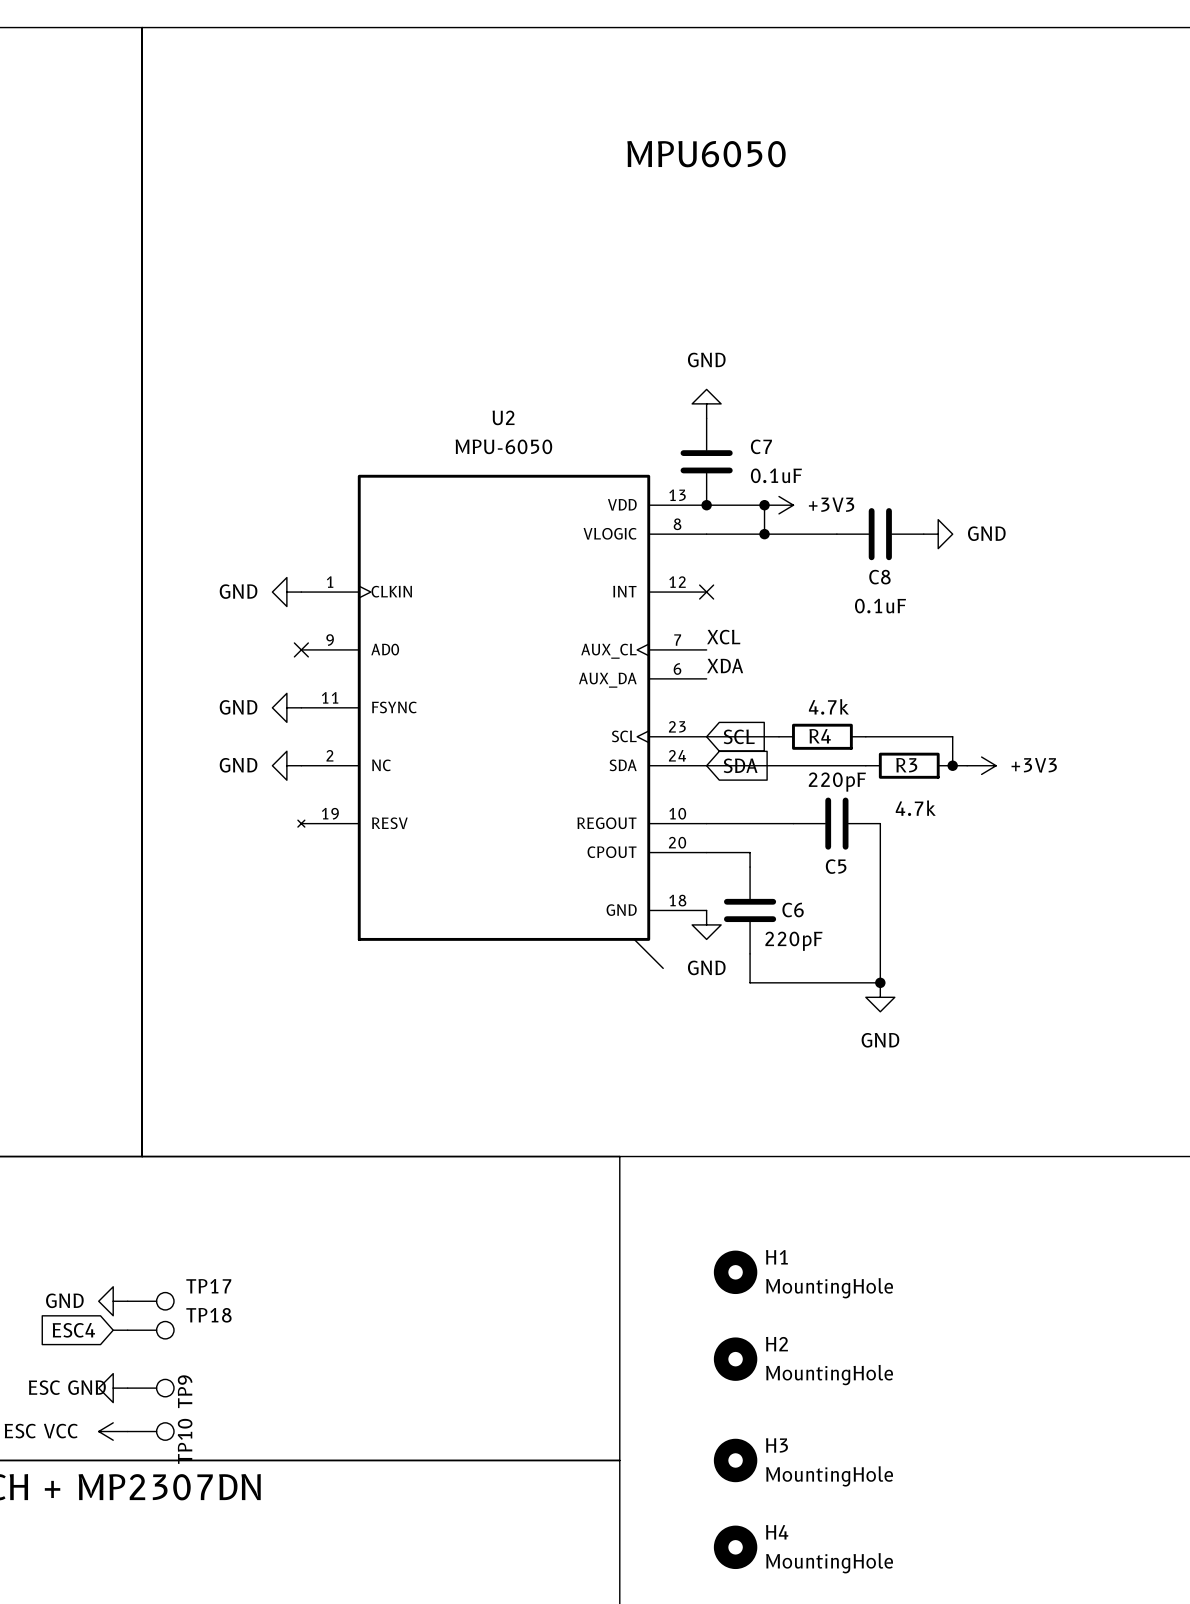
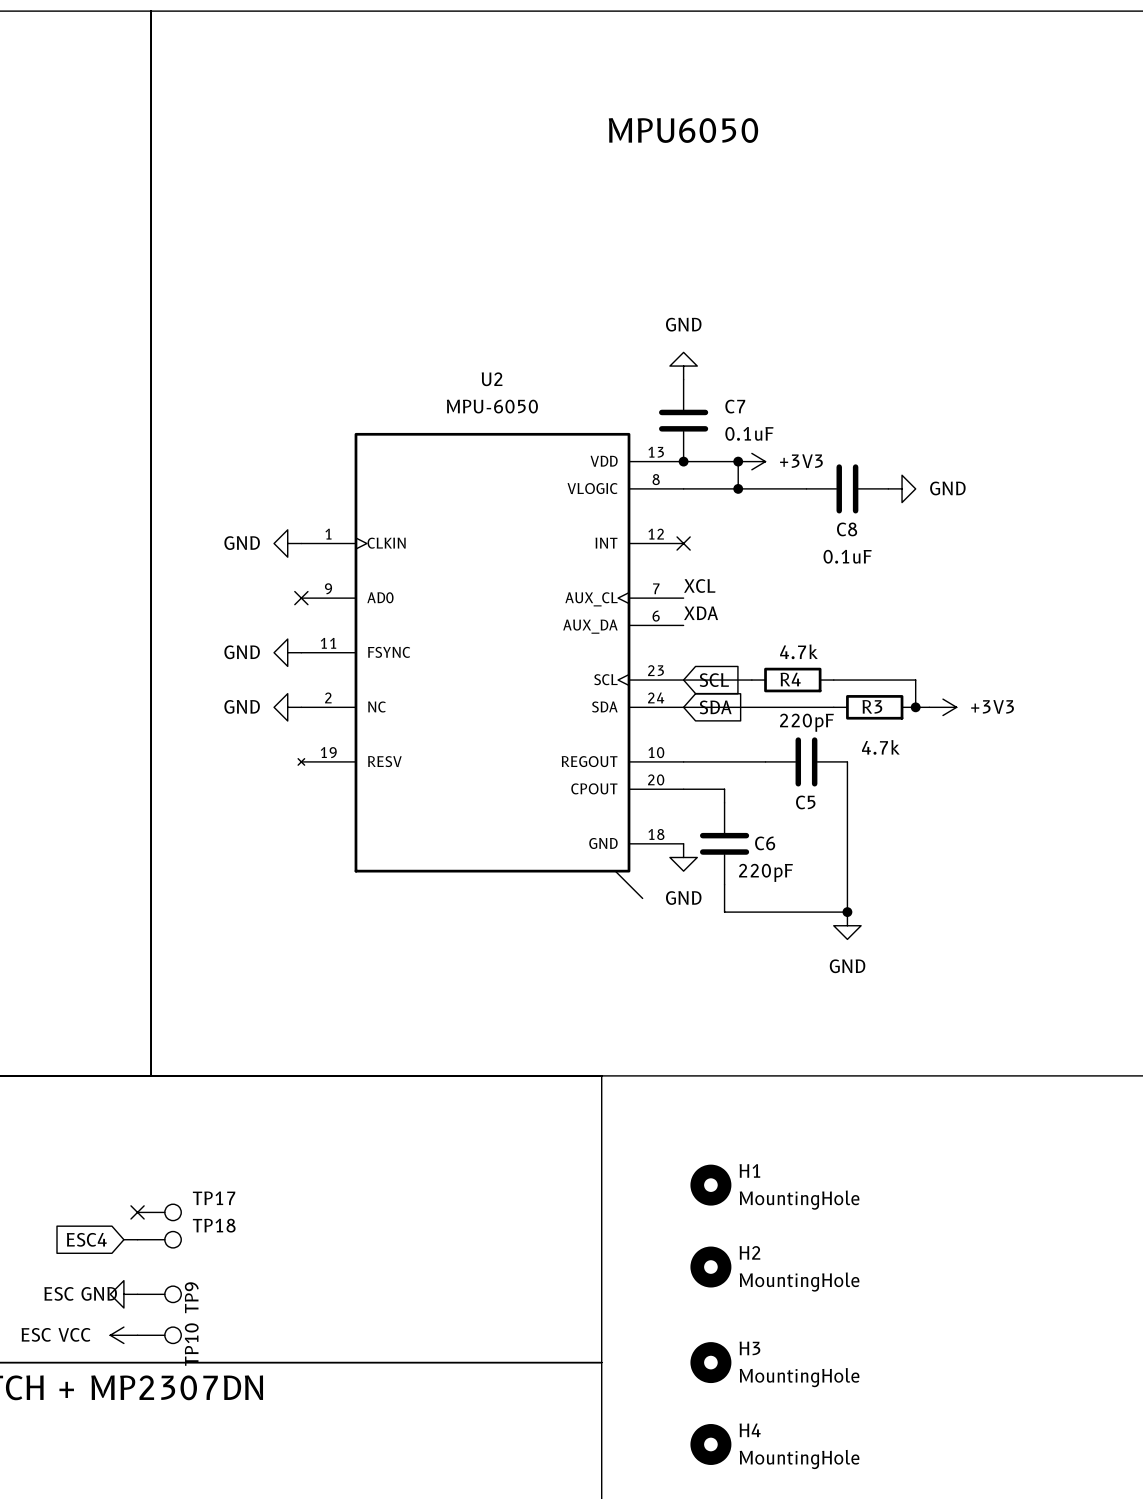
power symbol: GND (113, 1301) -> none
no-connect mark: none -> (137, 1212)

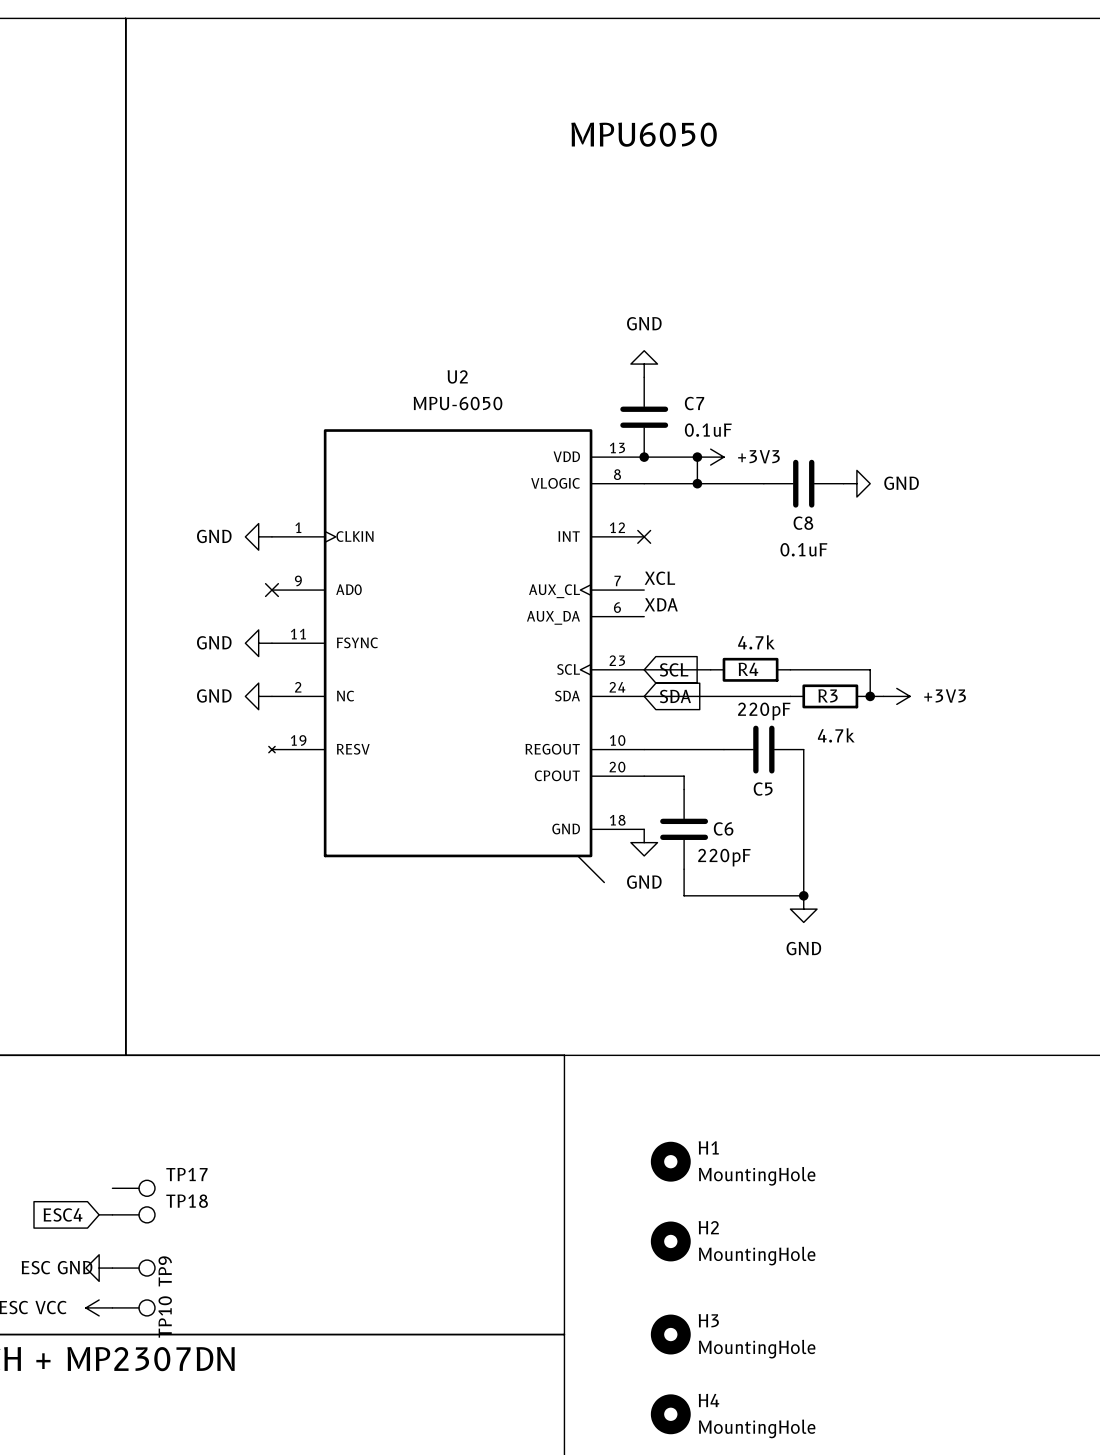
no-connect mark: (137, 1212) -> none

